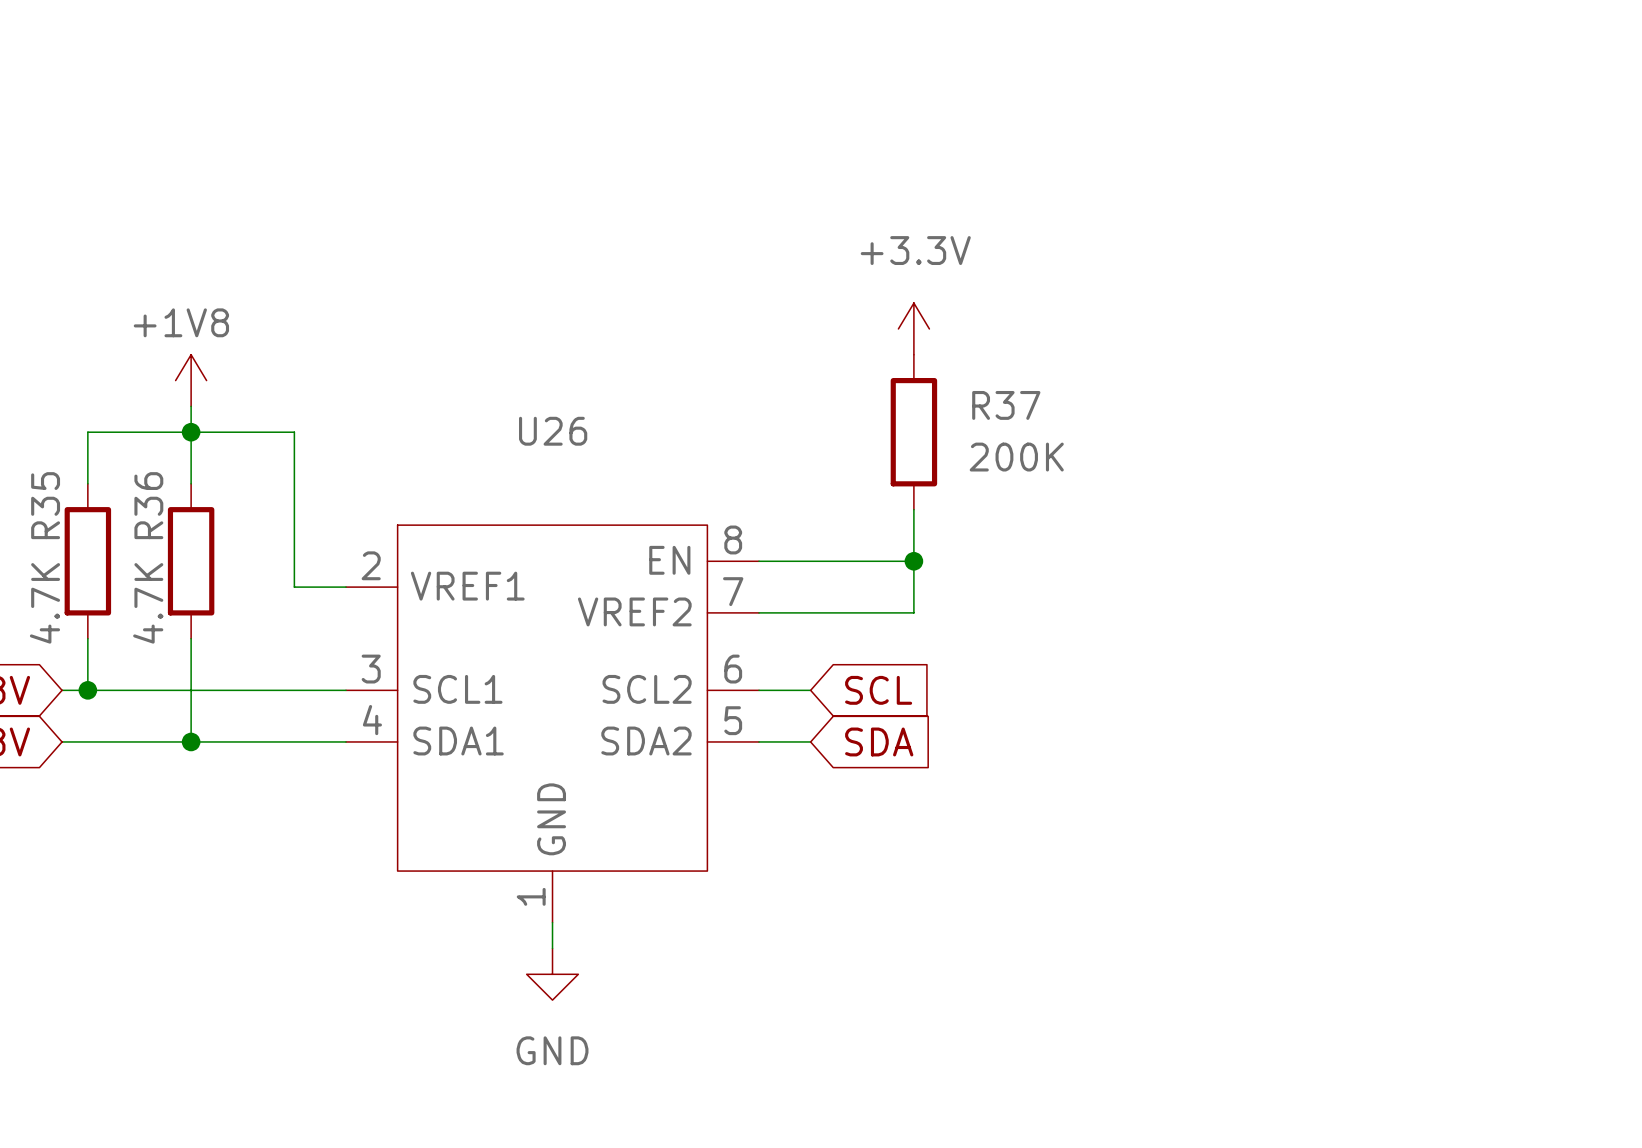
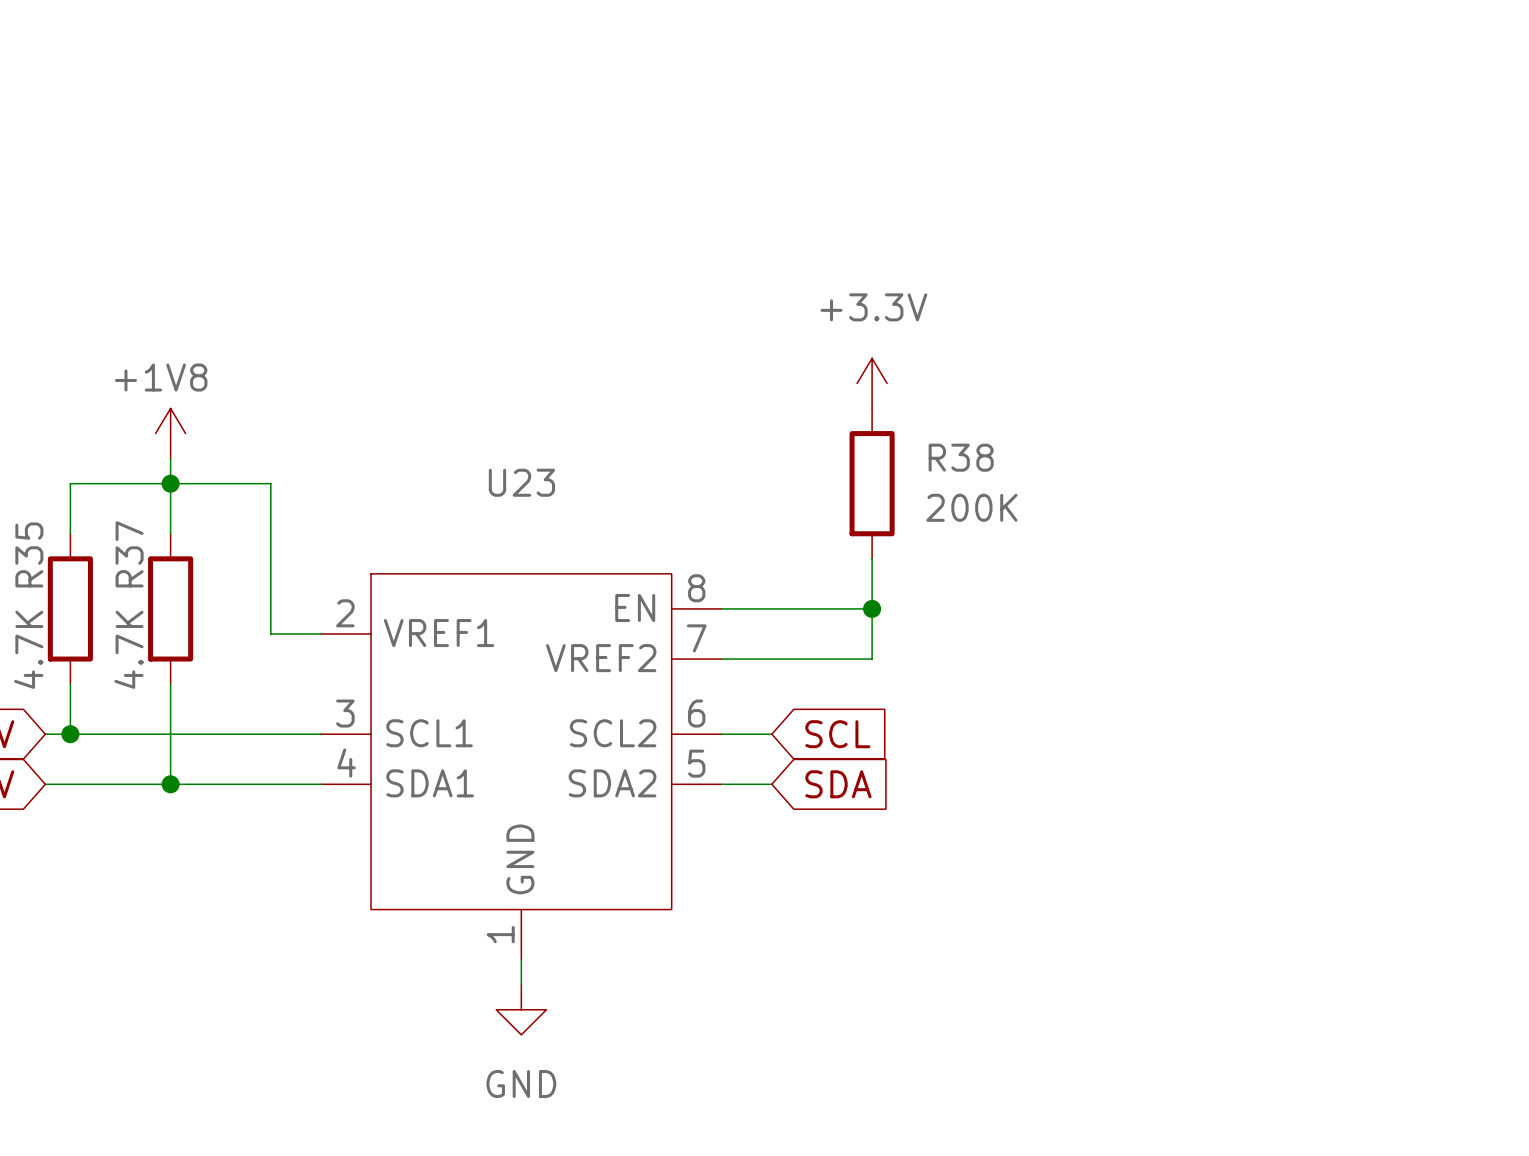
R37 name: R37 (1006, 405) -> R38 (961, 457)
U26 name: U26 (553, 431) -> U23 (521, 482)
R36 name: R36 (148, 505) -> R37 (129, 554)

